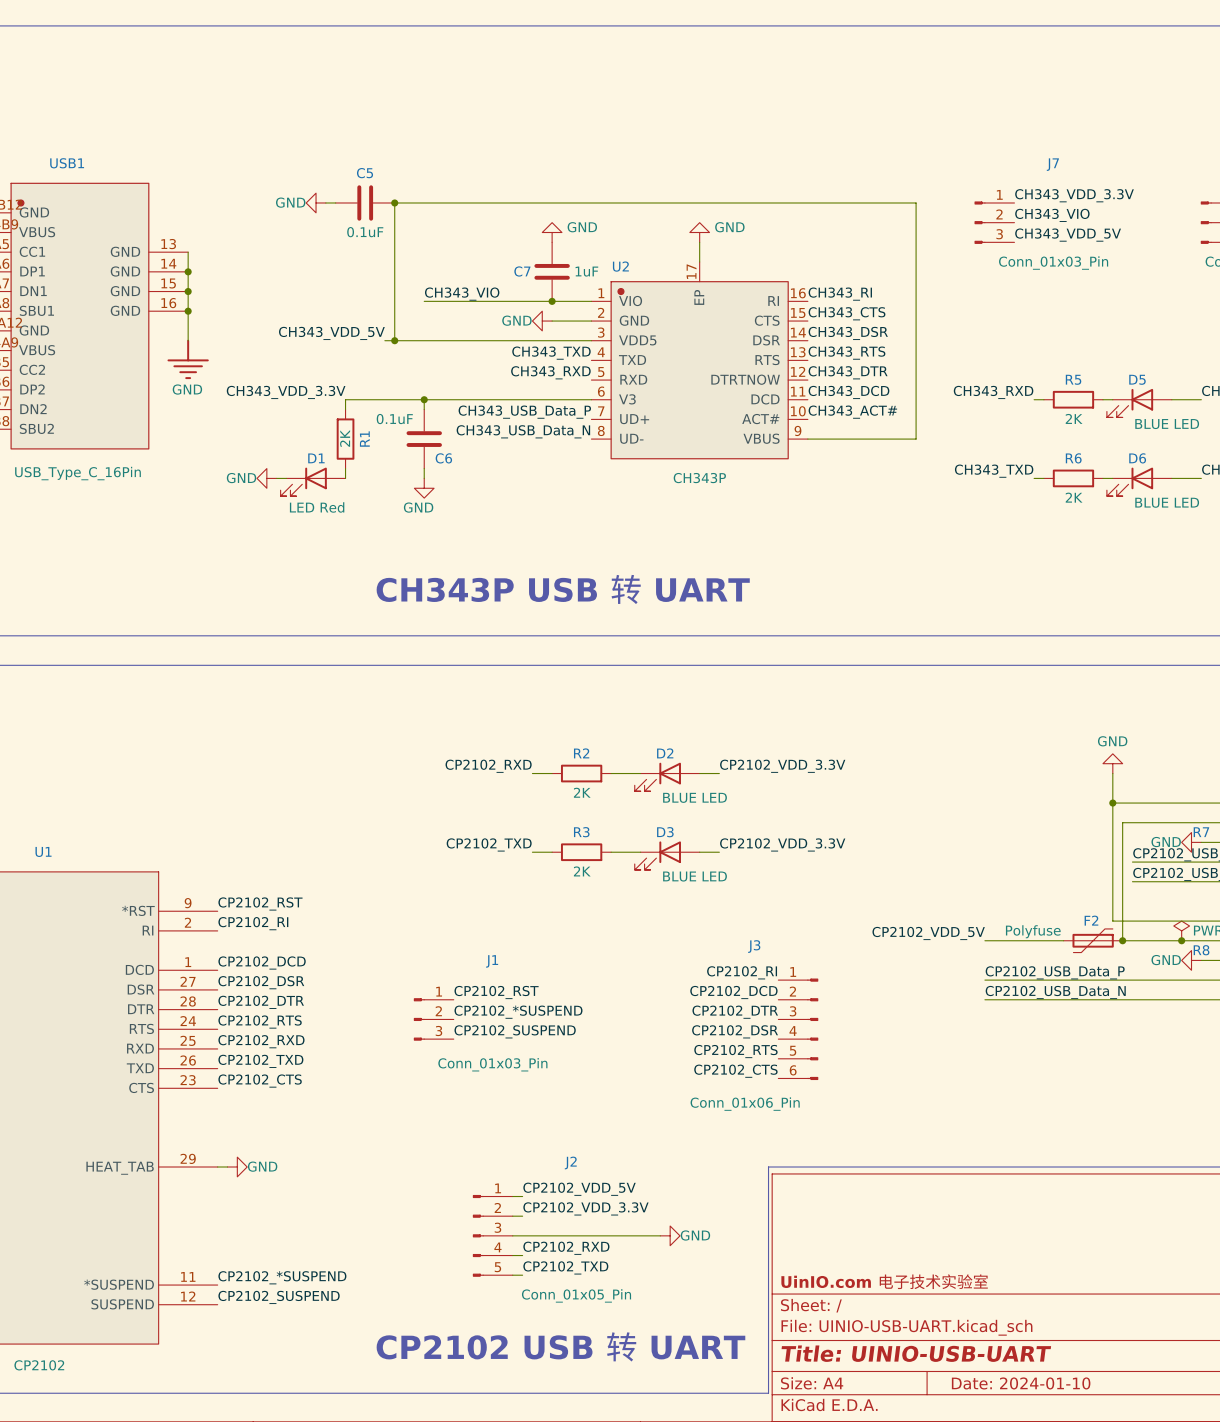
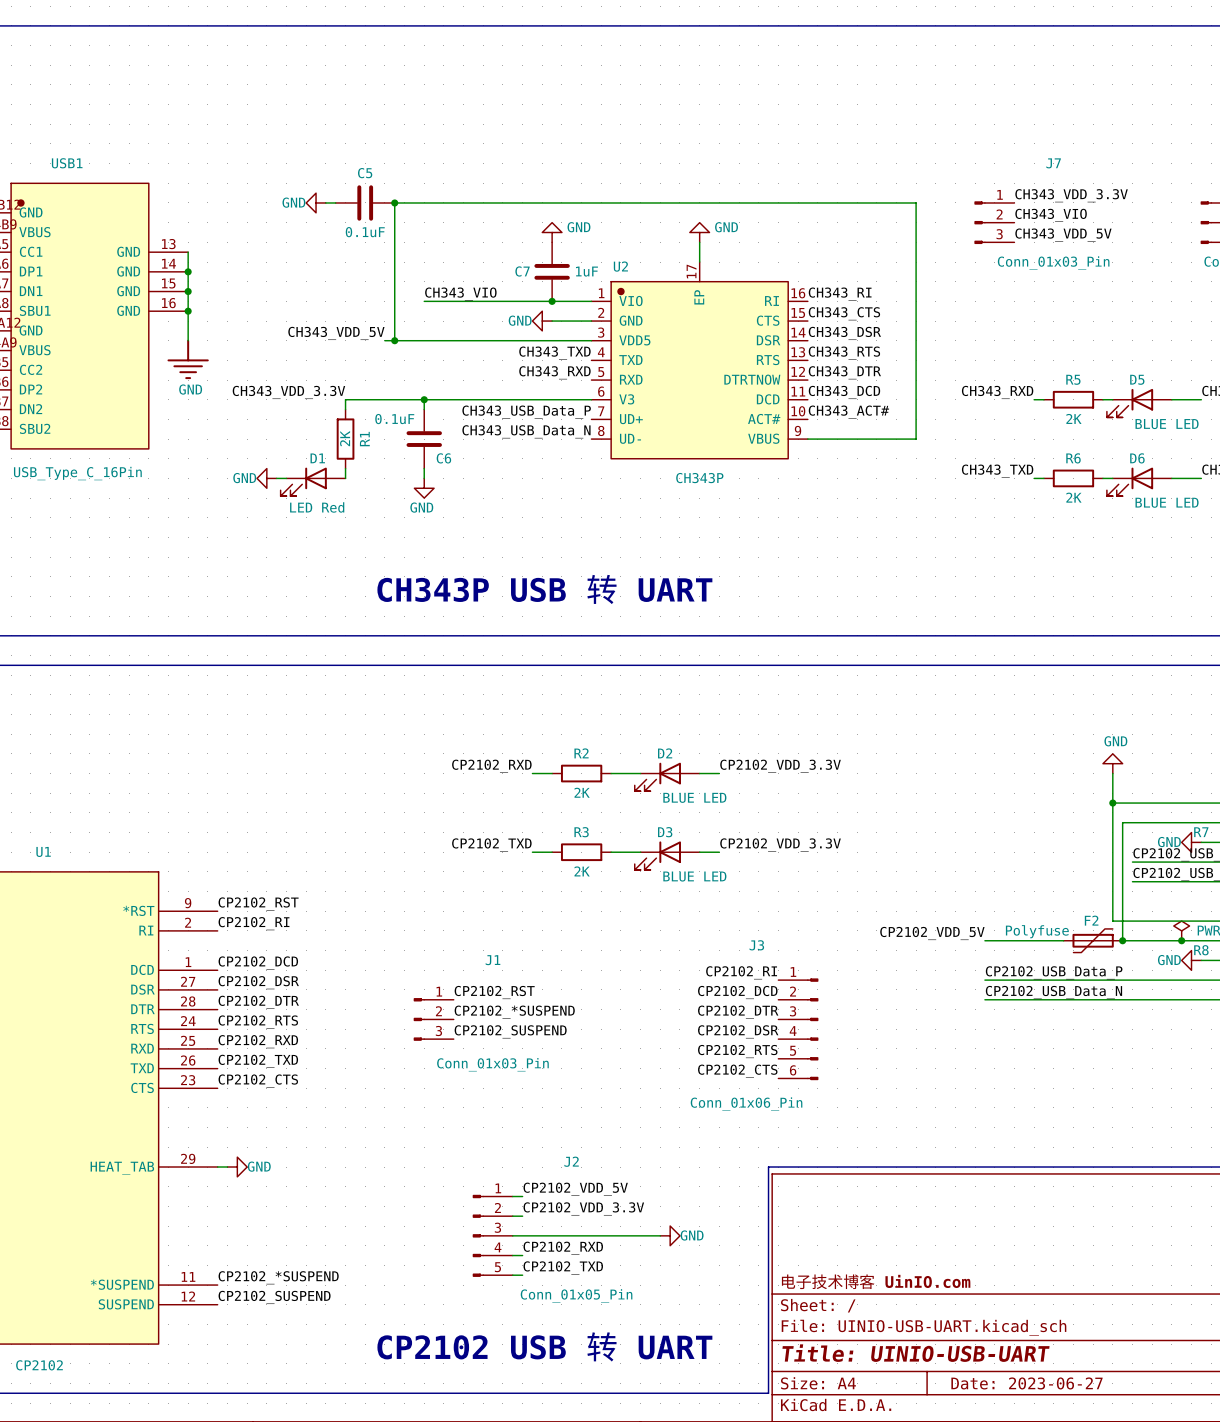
title block: UinIO.com 电子技术实验室 (884, 1281) -> 电子技术博客 UinIO.com (876, 1281)
title block: Date: 2024-01-10 (1021, 1383) -> Date: 2023-06-27 (1027, 1383)

